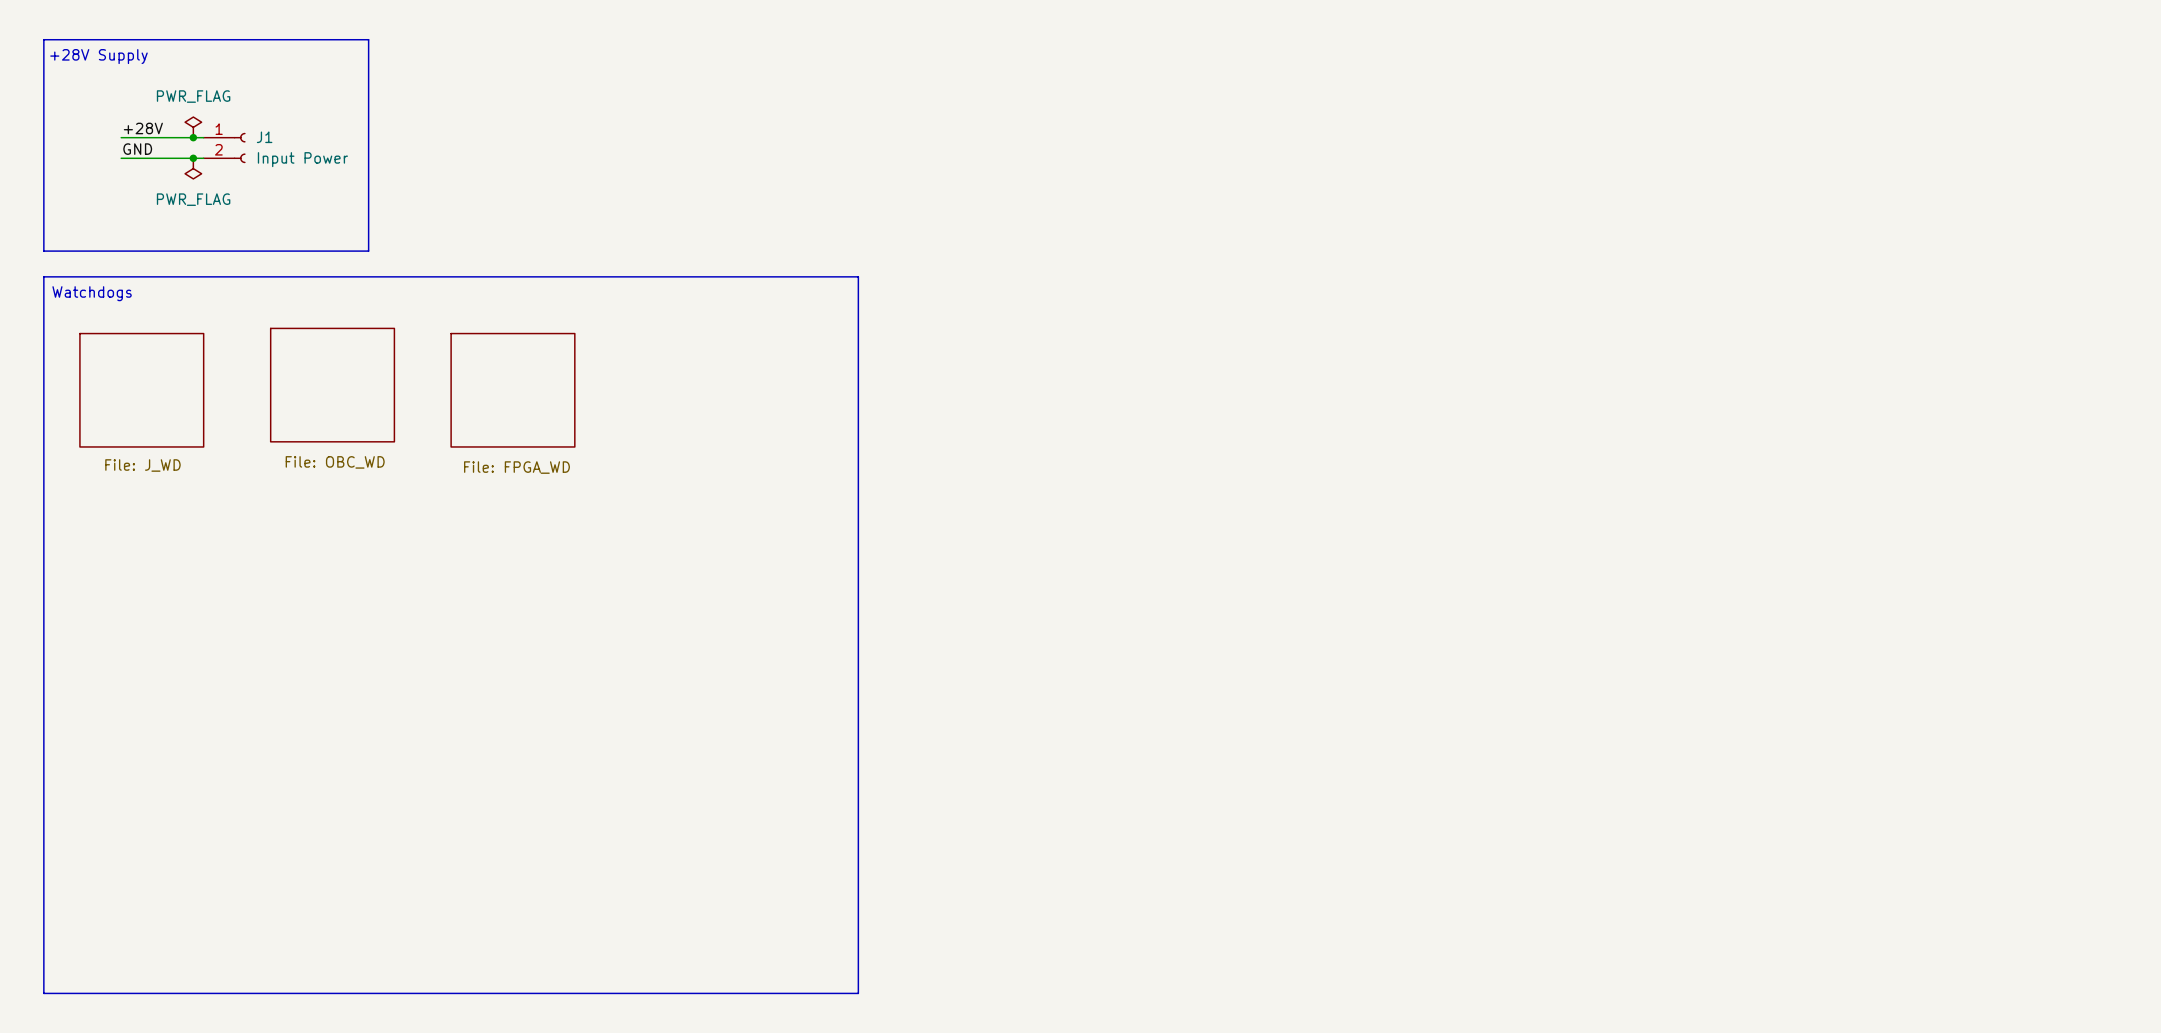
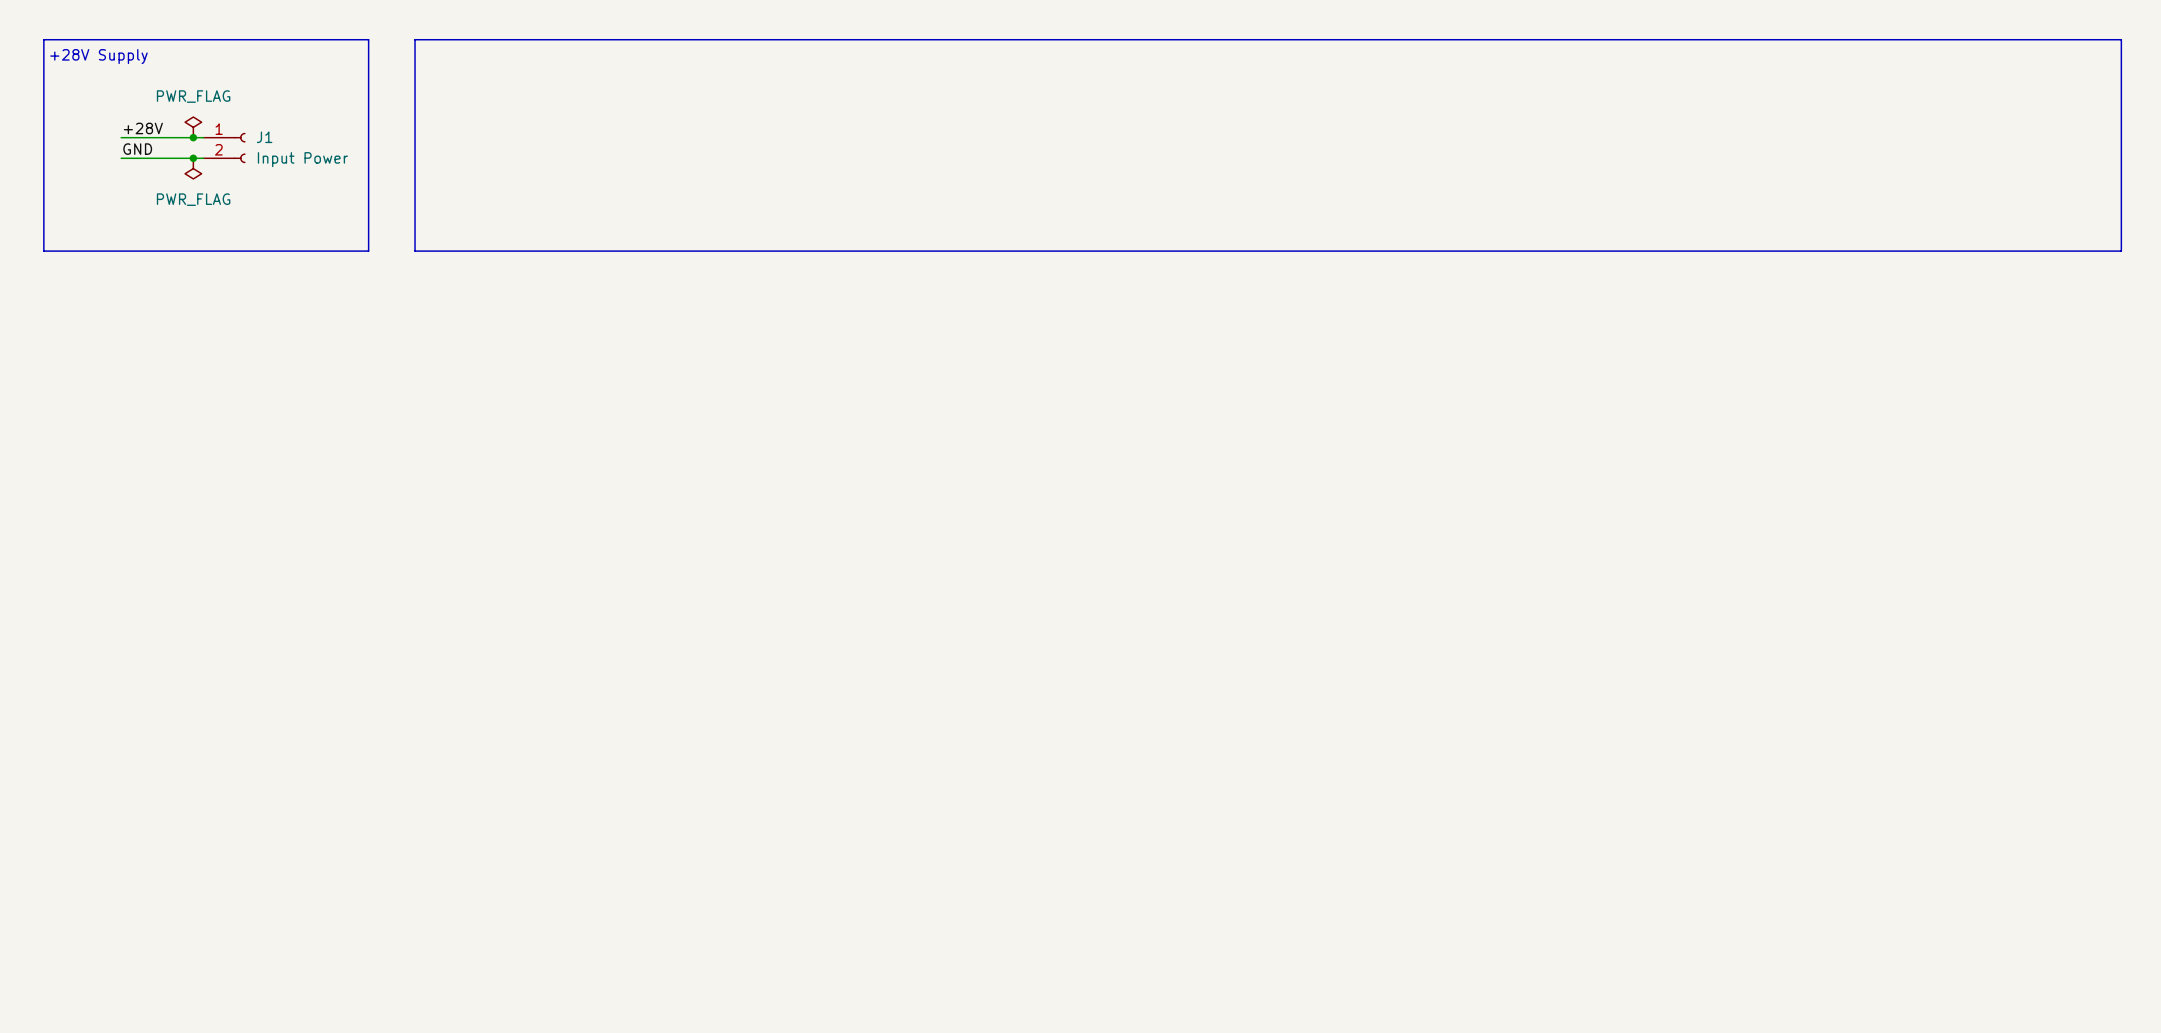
line: none -> (415, 39) (2121, 39) (2121, 251) (415, 251) (415, 39)
line: (43, 276) (43, 993) (858, 993) (858, 276) (43, 276) -> none
text: Watchdogs (92, 293) -> none
sheet: File: OBC_WD (332, 385) -> none
sheet: File: J_WD (141, 390) -> none
sheet: File: FPGA_WD (512, 390) -> none

